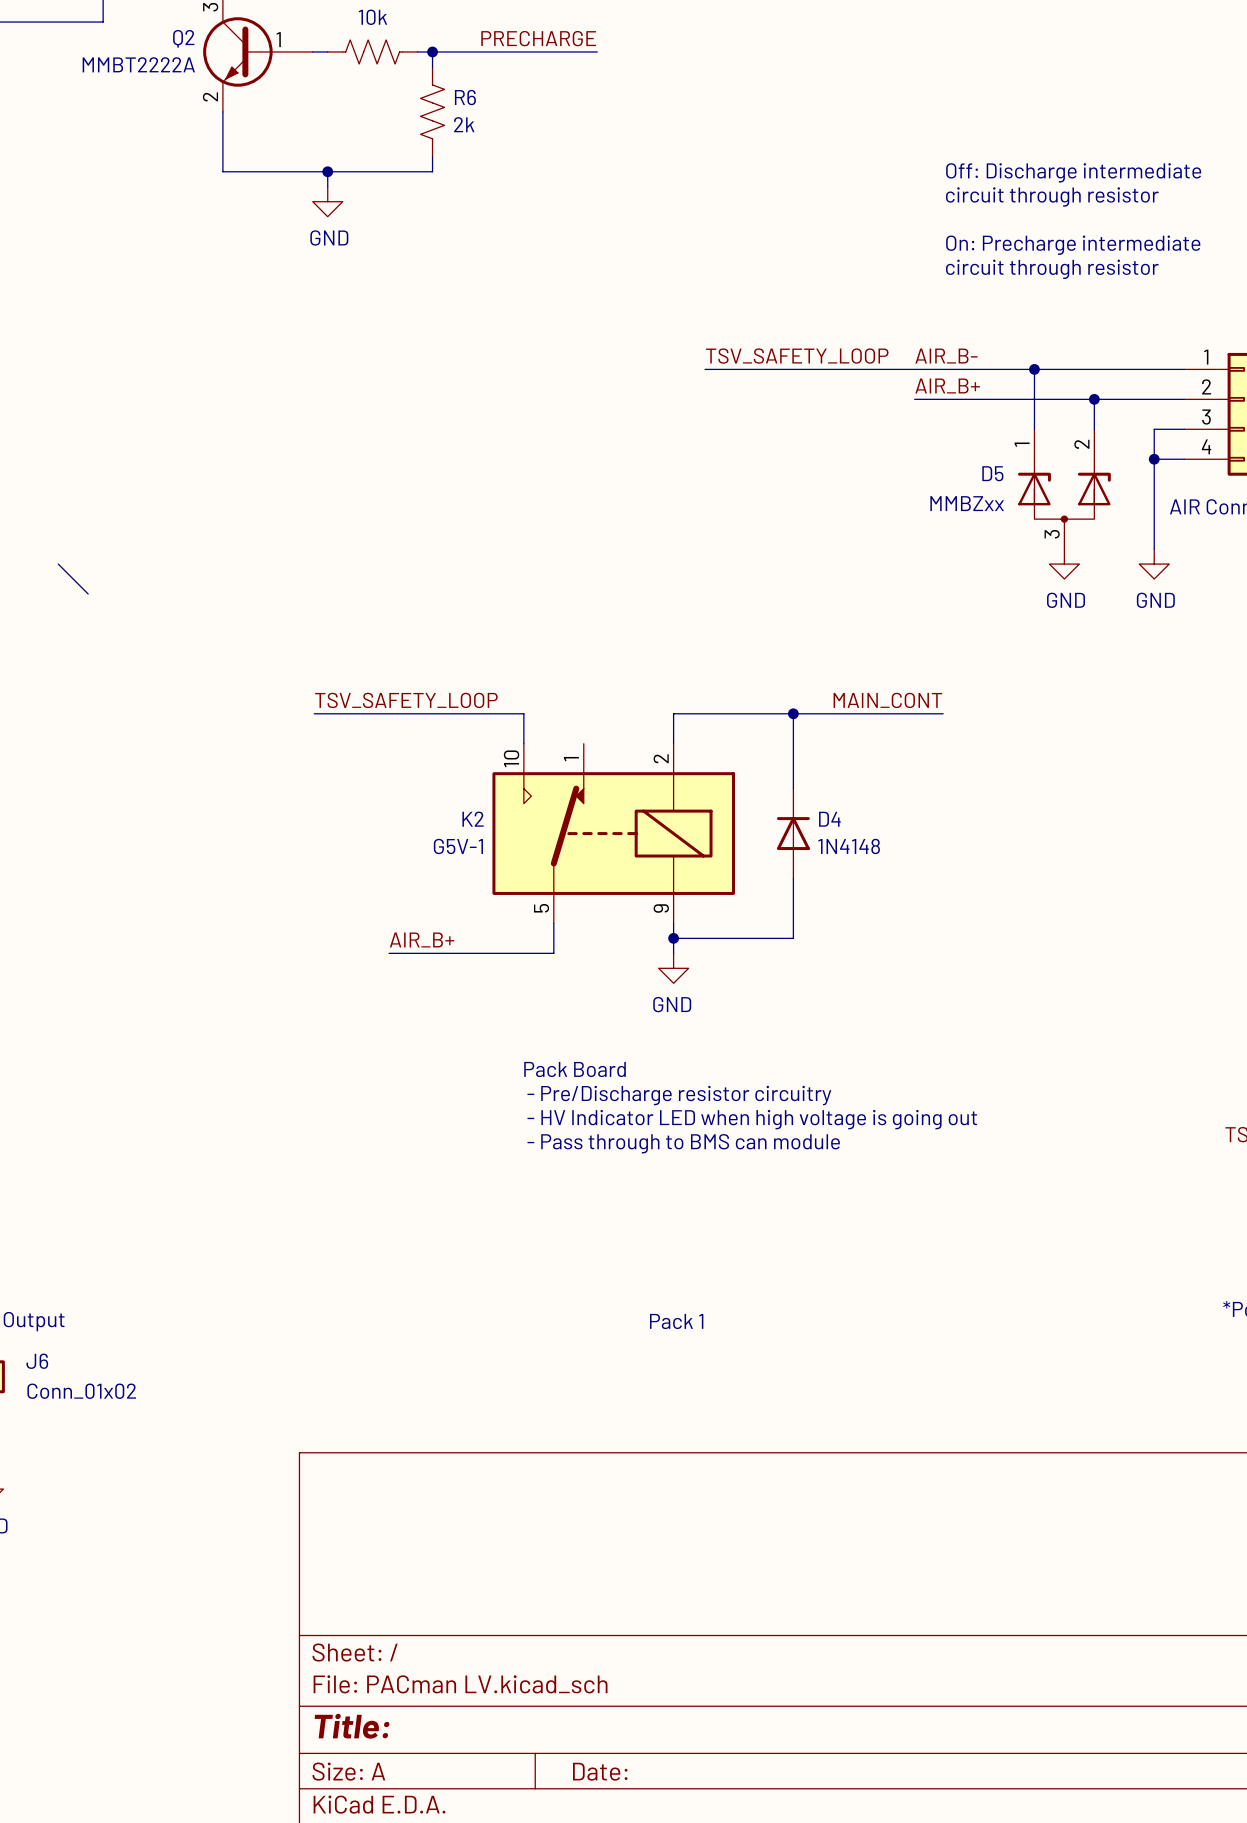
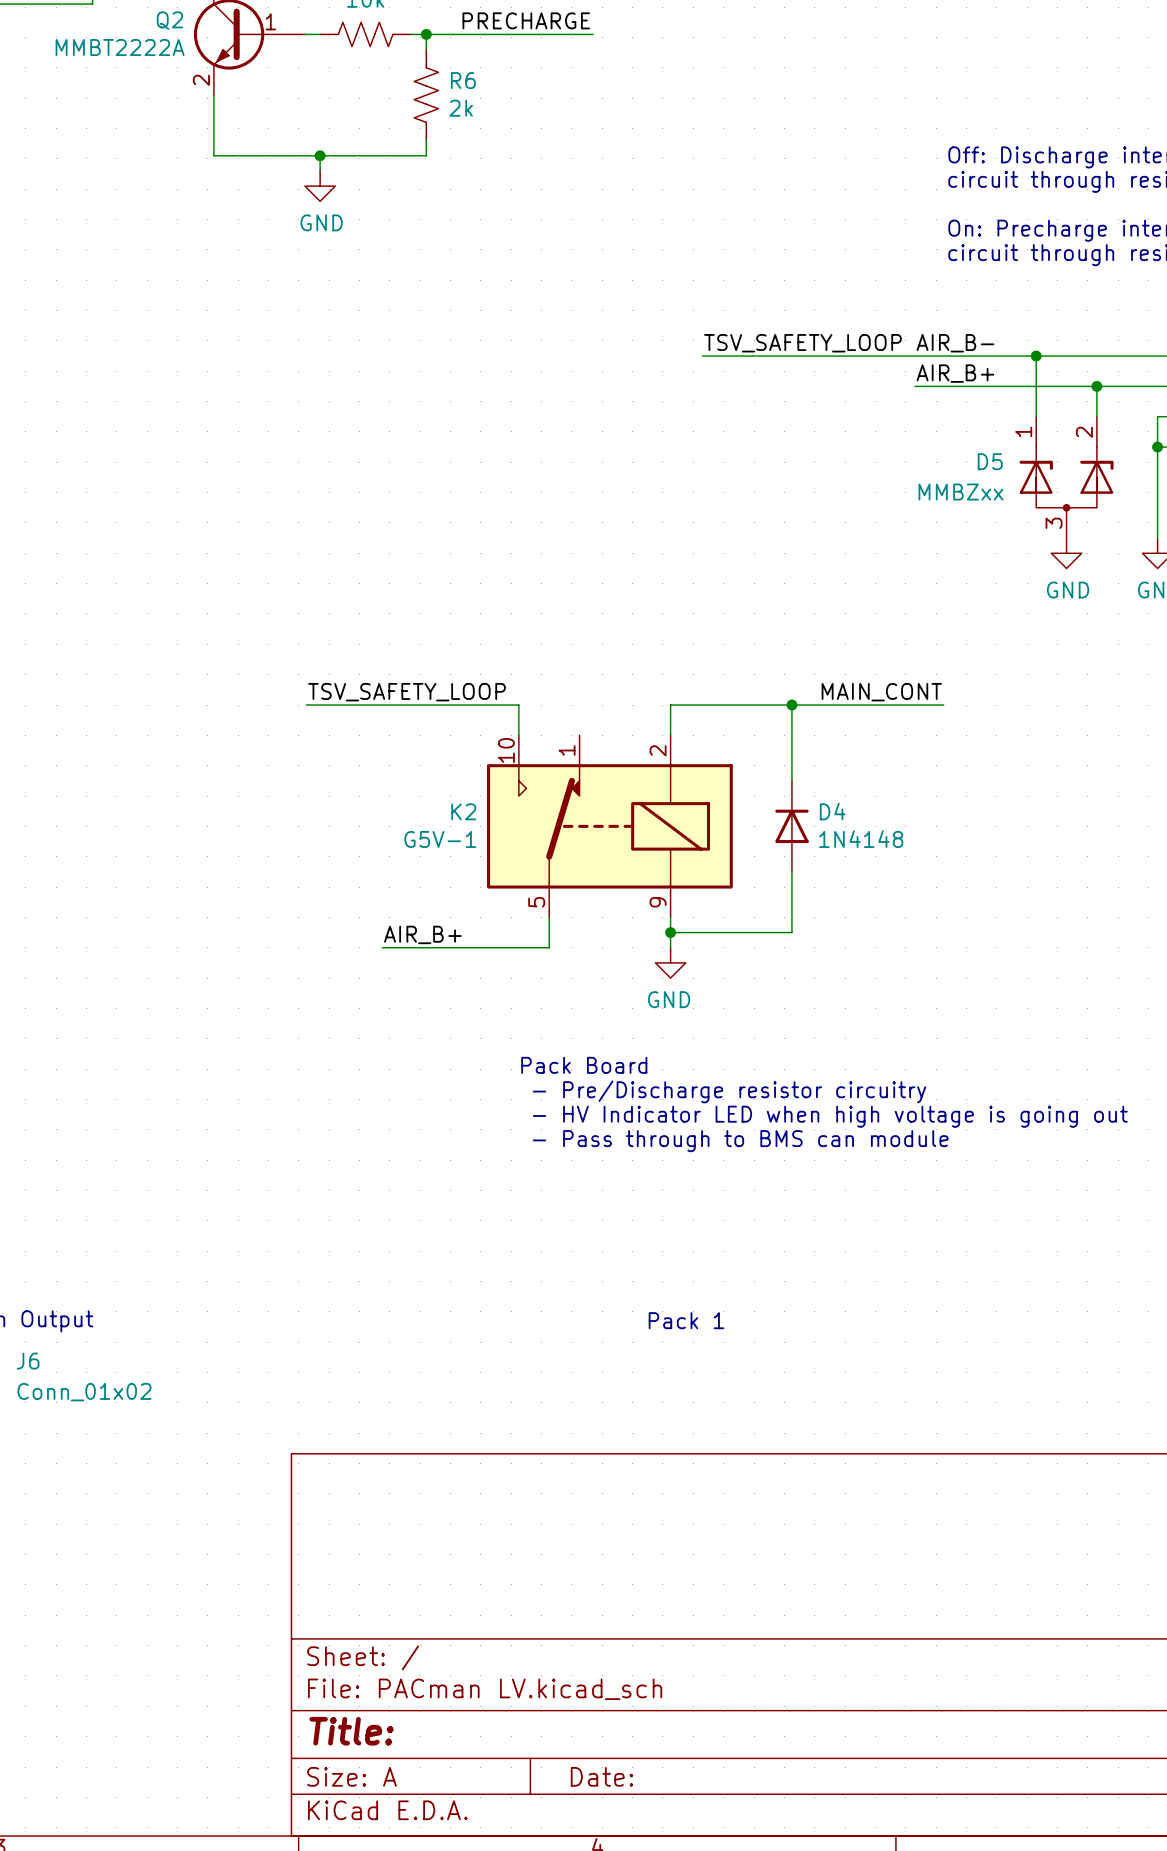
wire: (58, 564) (88, 594) -> none

